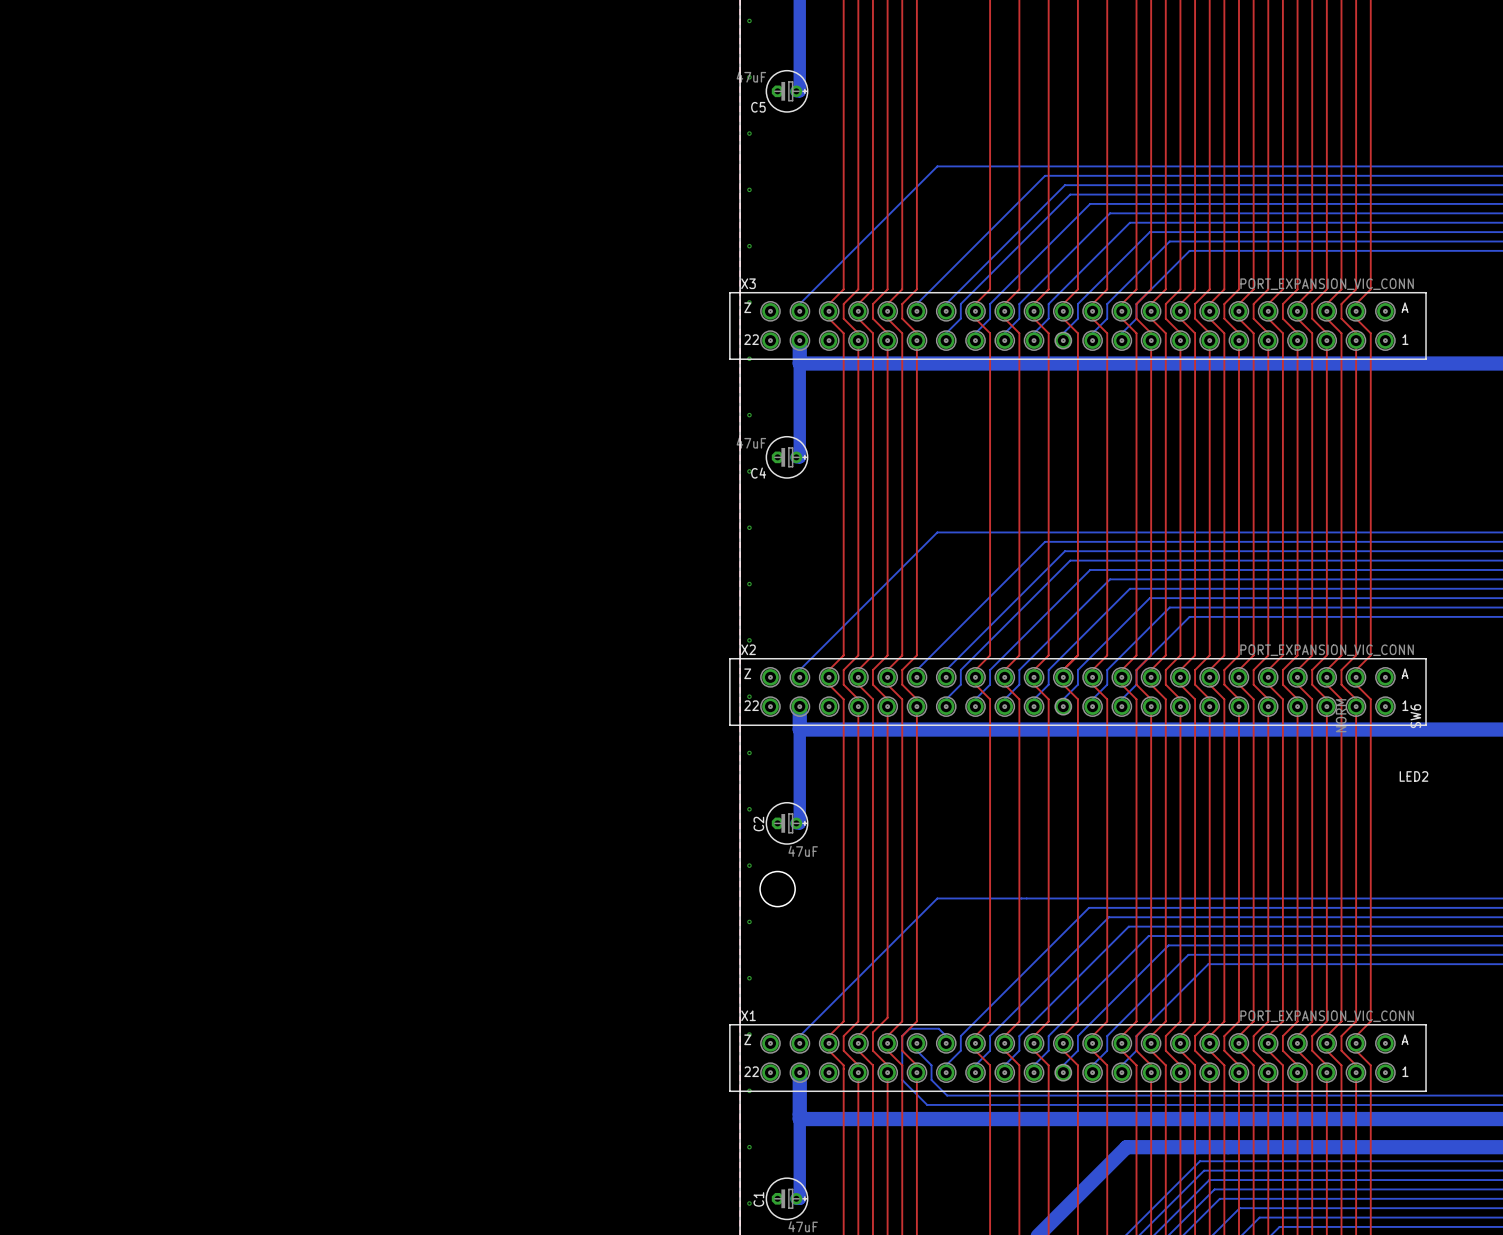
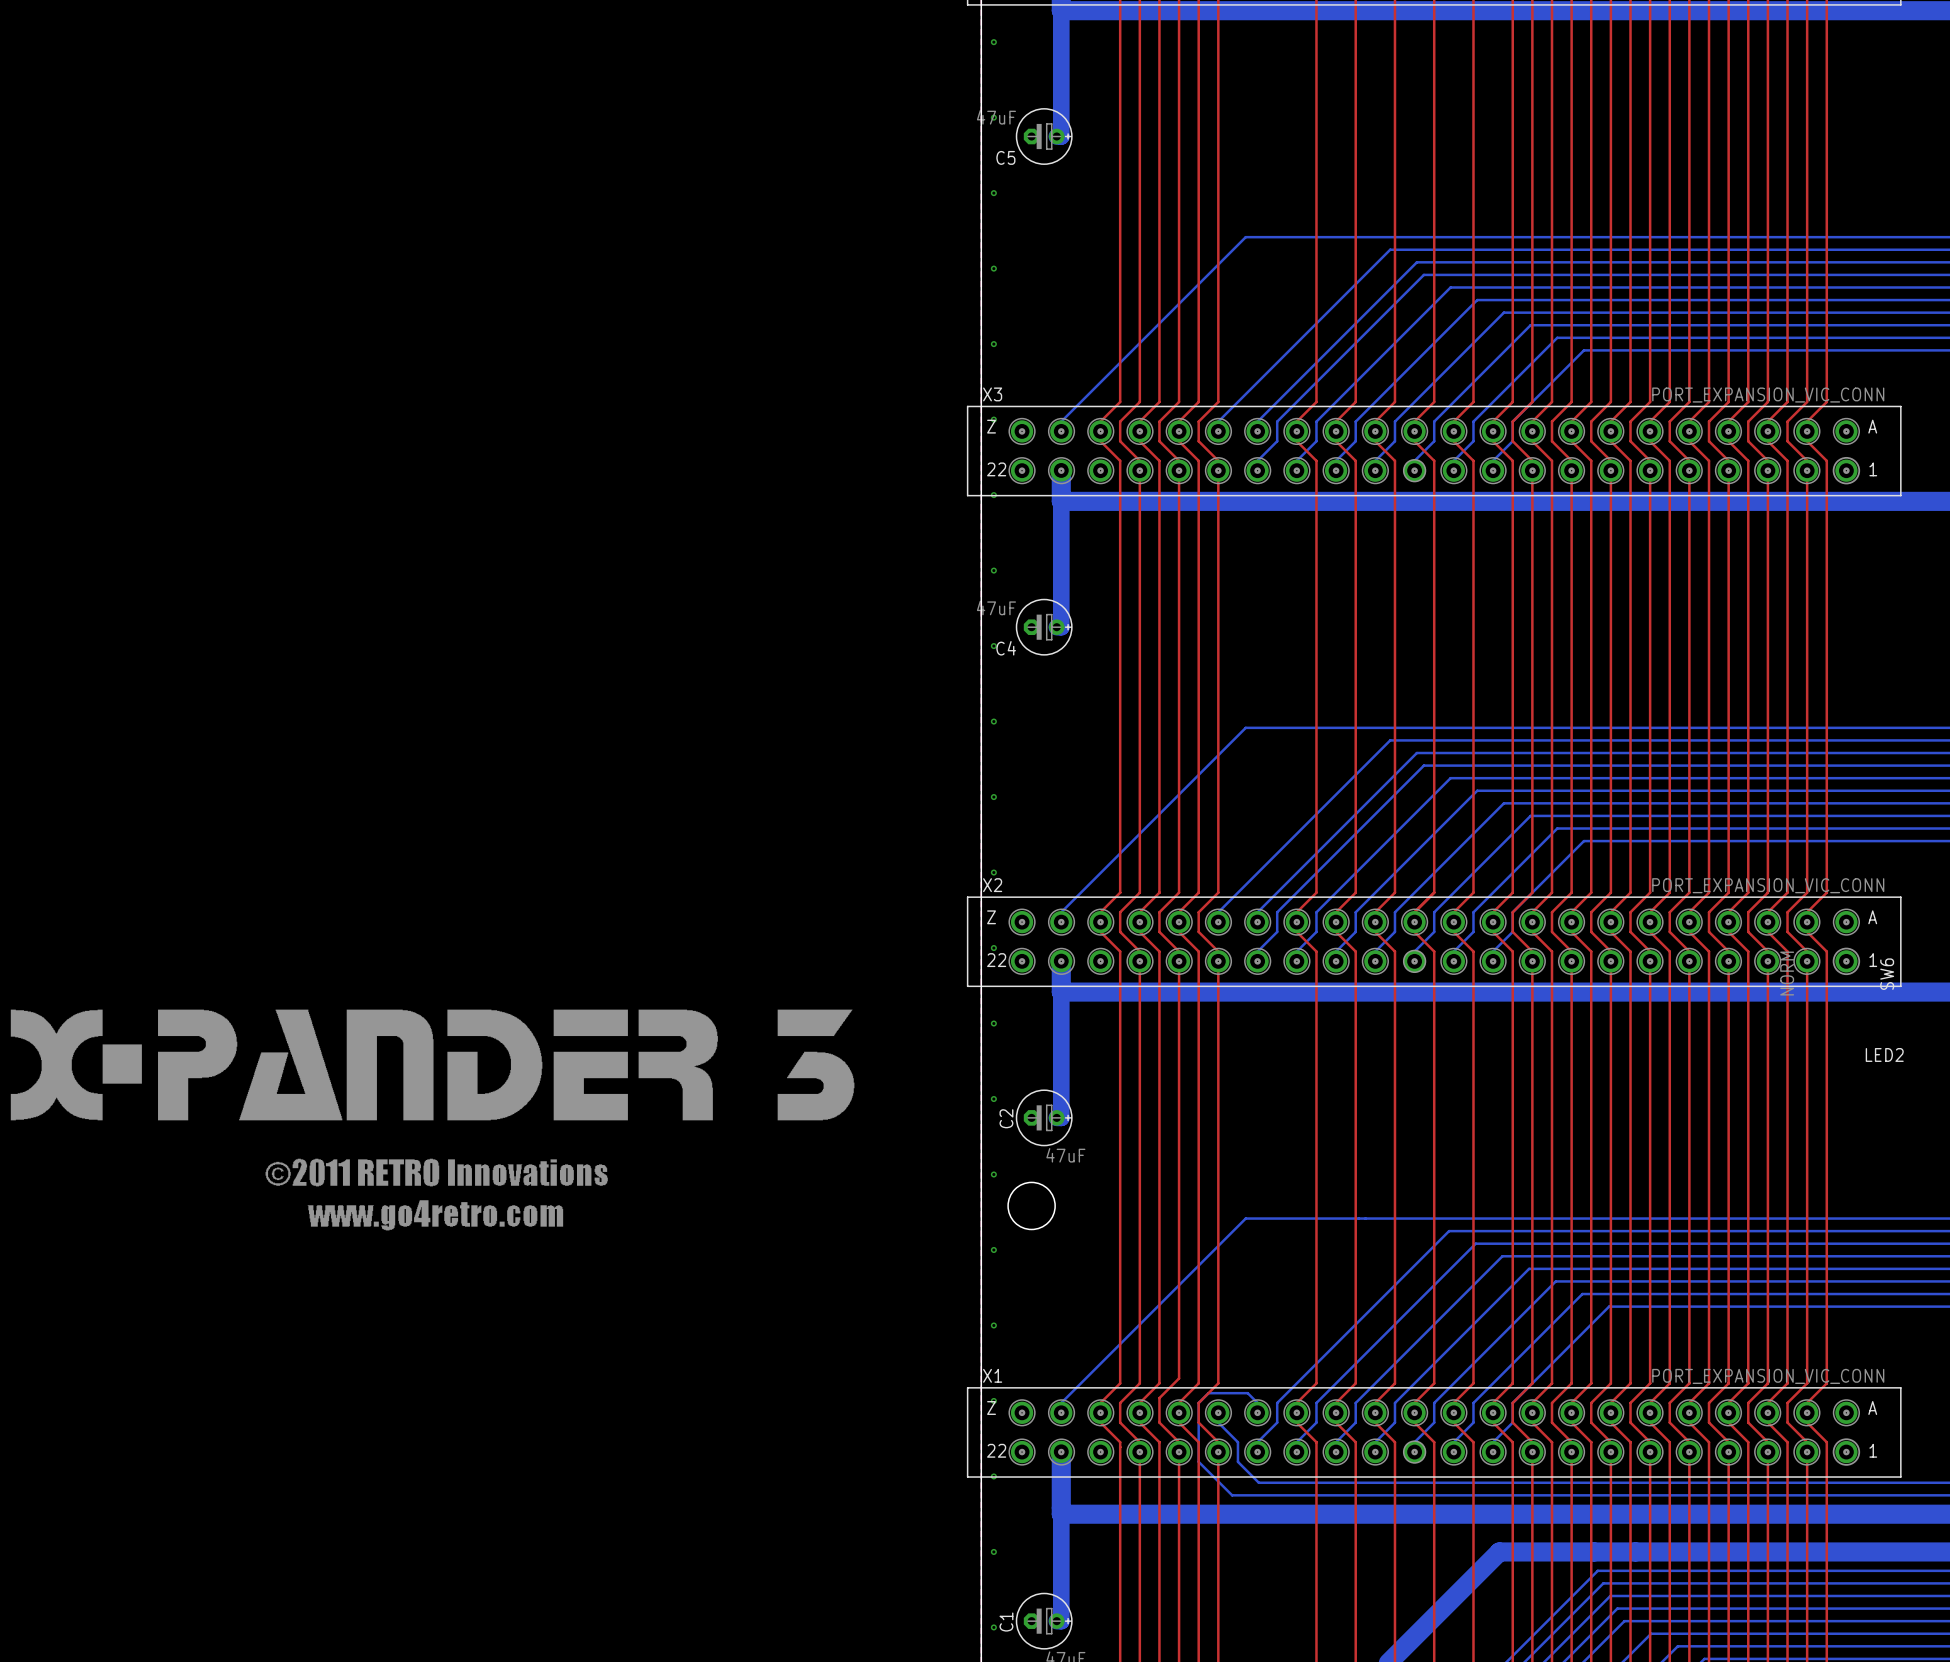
drawing: none -> [10, 1009, 142, 1121]
drawing: none -> [158, 1009, 238, 1121]
drawing: none -> [239, 1009, 434, 1121]
drawing: none -> [447, 1009, 718, 1121]
drawing: none -> [777, 1009, 853, 1037]
drawing: none -> [777, 1051, 855, 1121]
drawing: none -> [265, 1158, 608, 1187]
drawing: none -> [307, 1200, 564, 1231]

